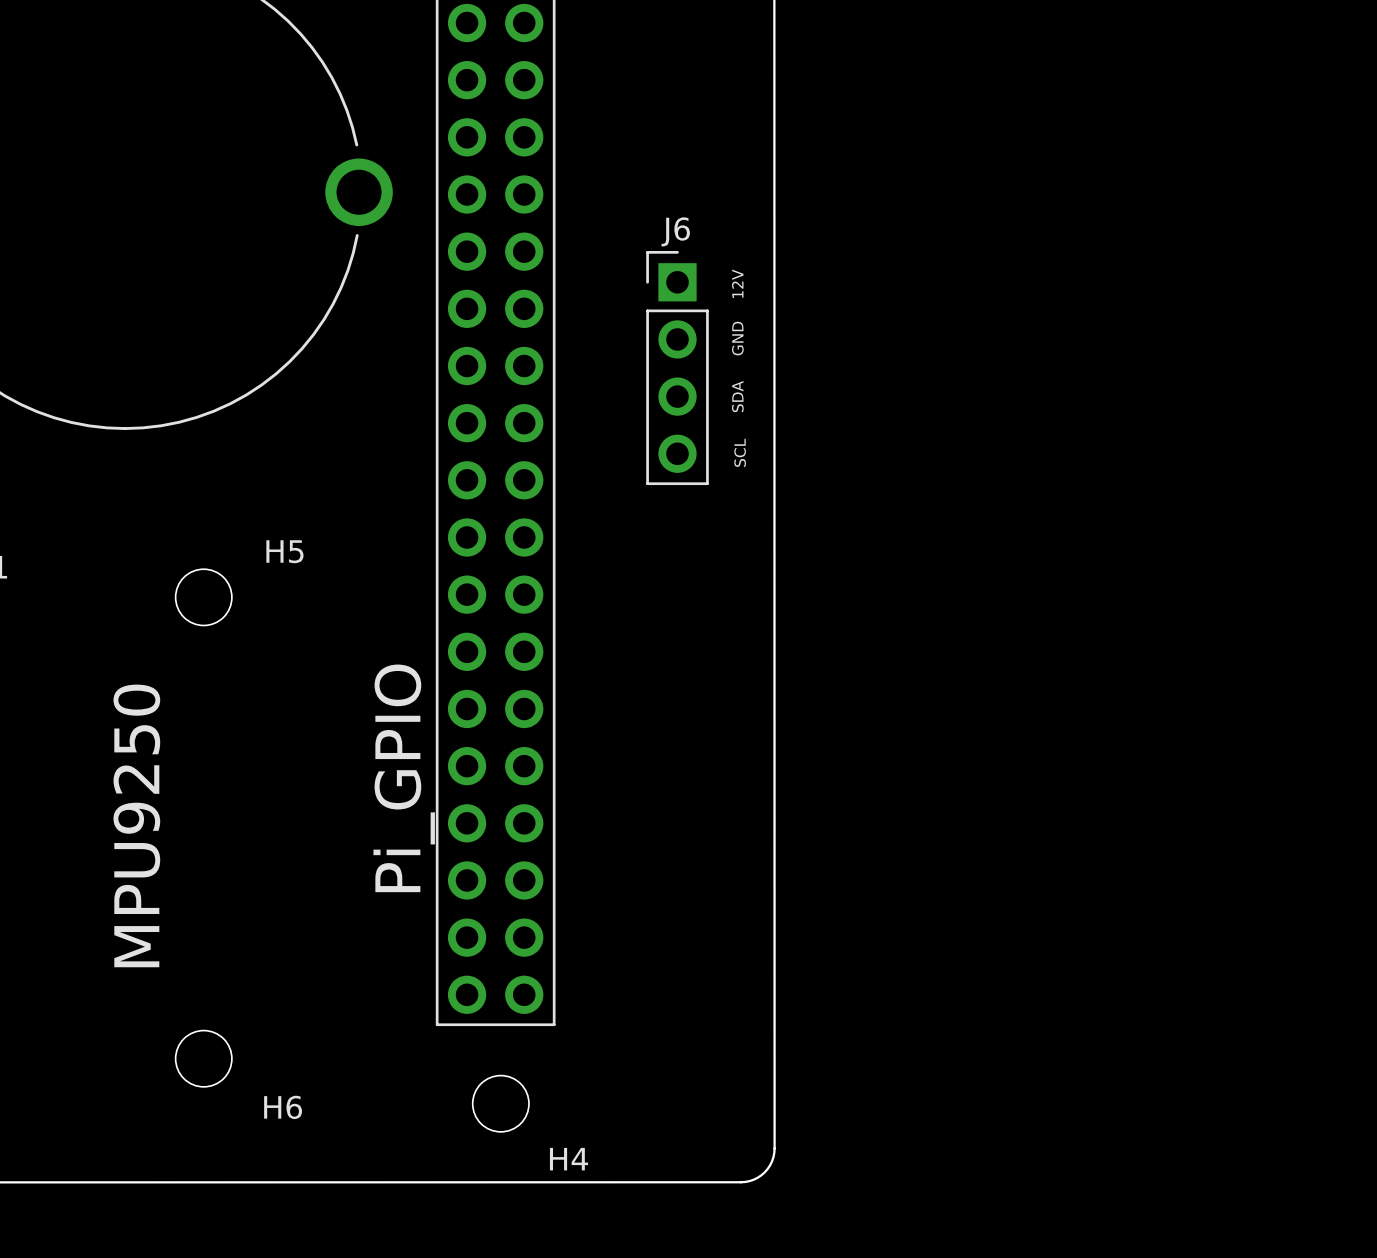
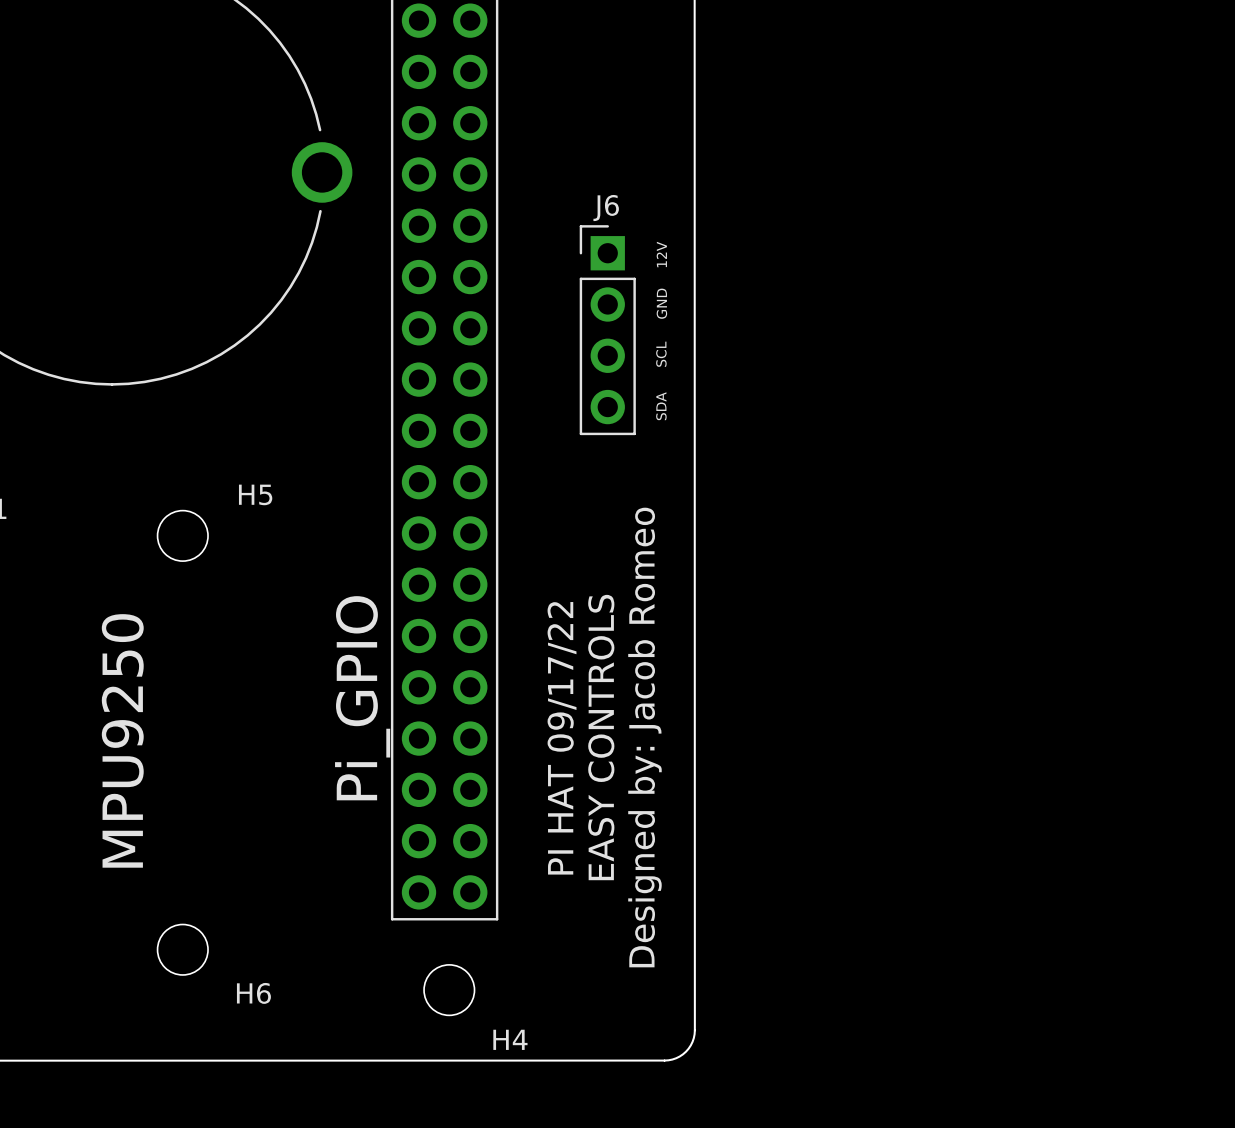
text: SDA (737, 396) -> SCL (661, 354)
text: SCL (740, 452) -> SDA (661, 406)
text: none -> EASY CONTROLS (601, 737)
text: none -> Designed by: Jacob Romeo (644, 737)
text: none -> PI HAT 09/17/22 (562, 738)

